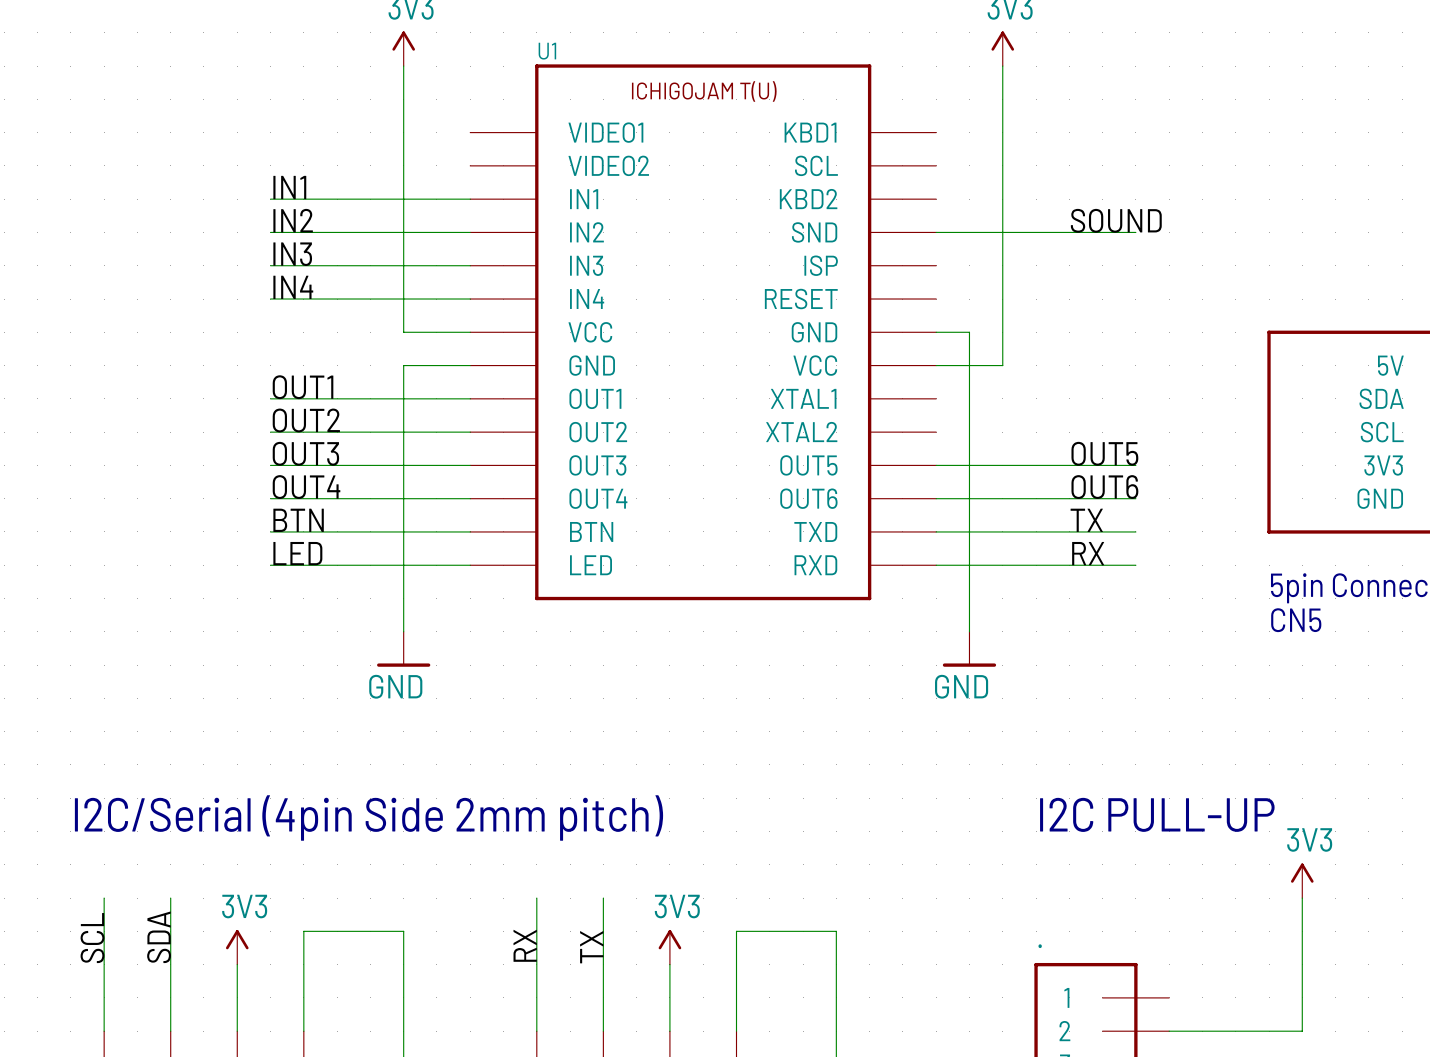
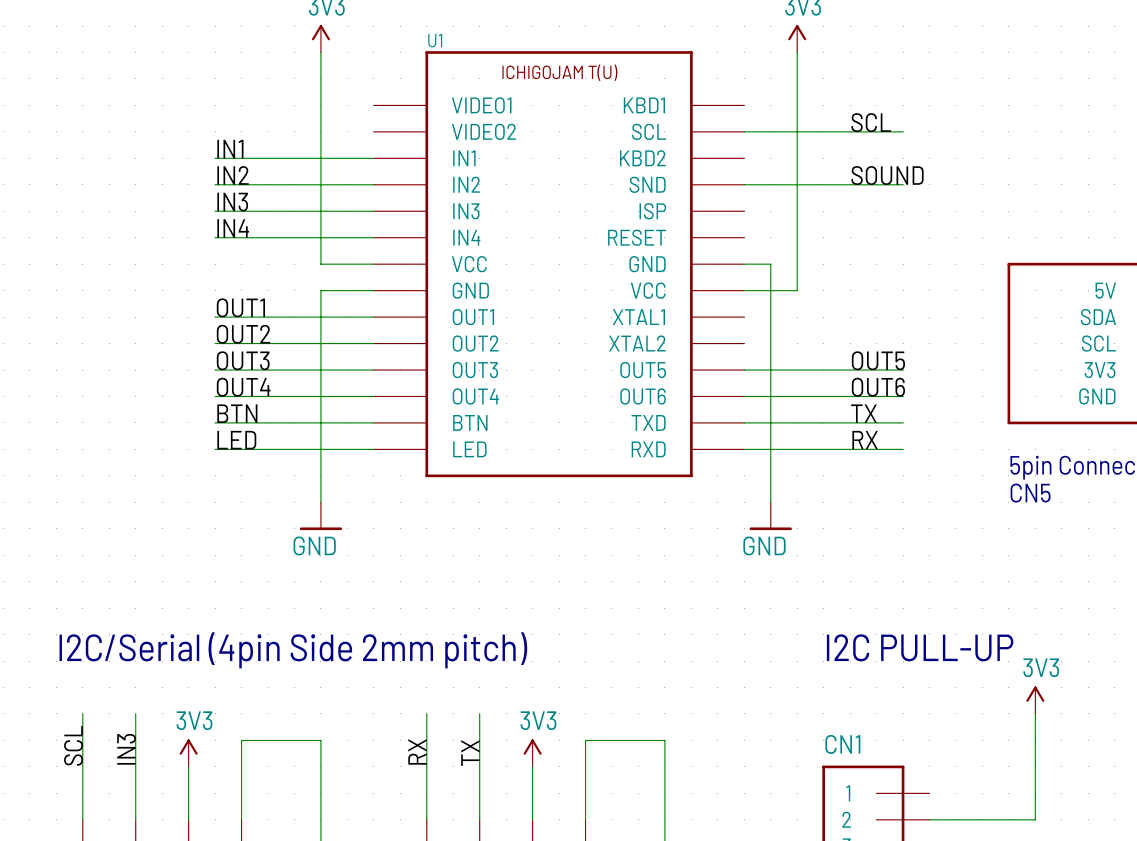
label: none -> SCL (871, 122)
wire: none -> (744, 131) (903, 131)
label: SDA (159, 937) -> IN3 (126, 749)
CN1 name: . (1040, 946) -> CN1 (842, 744)

